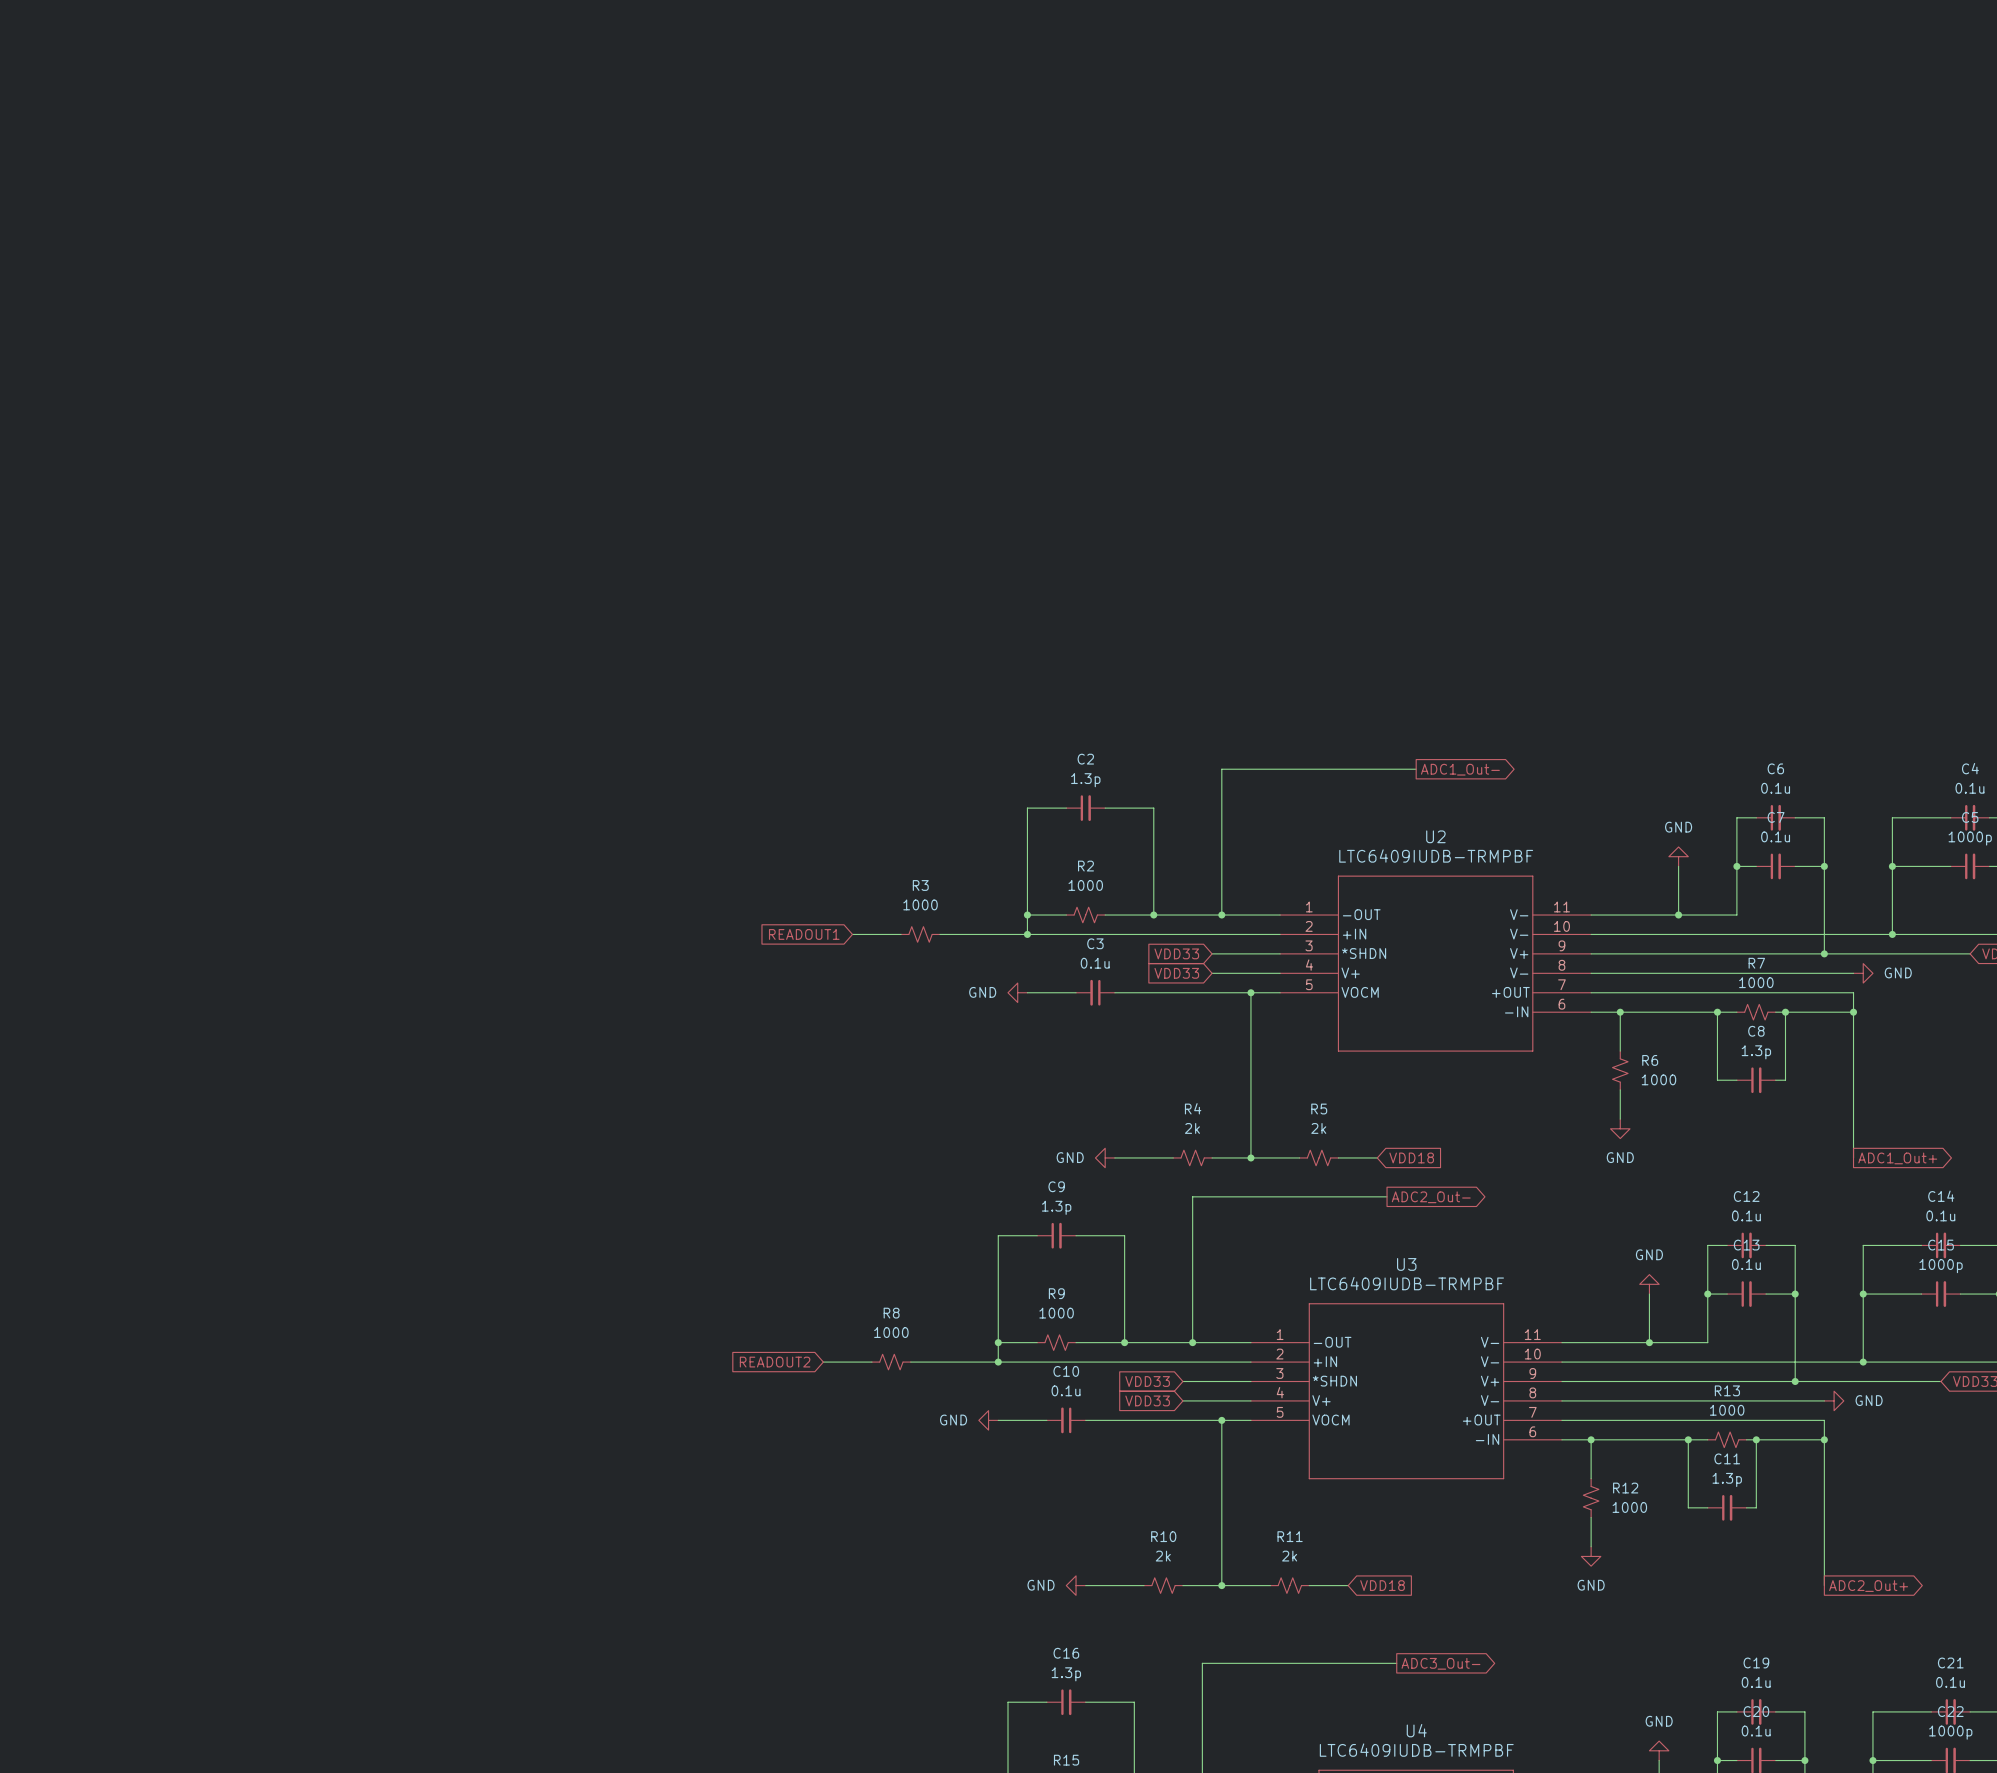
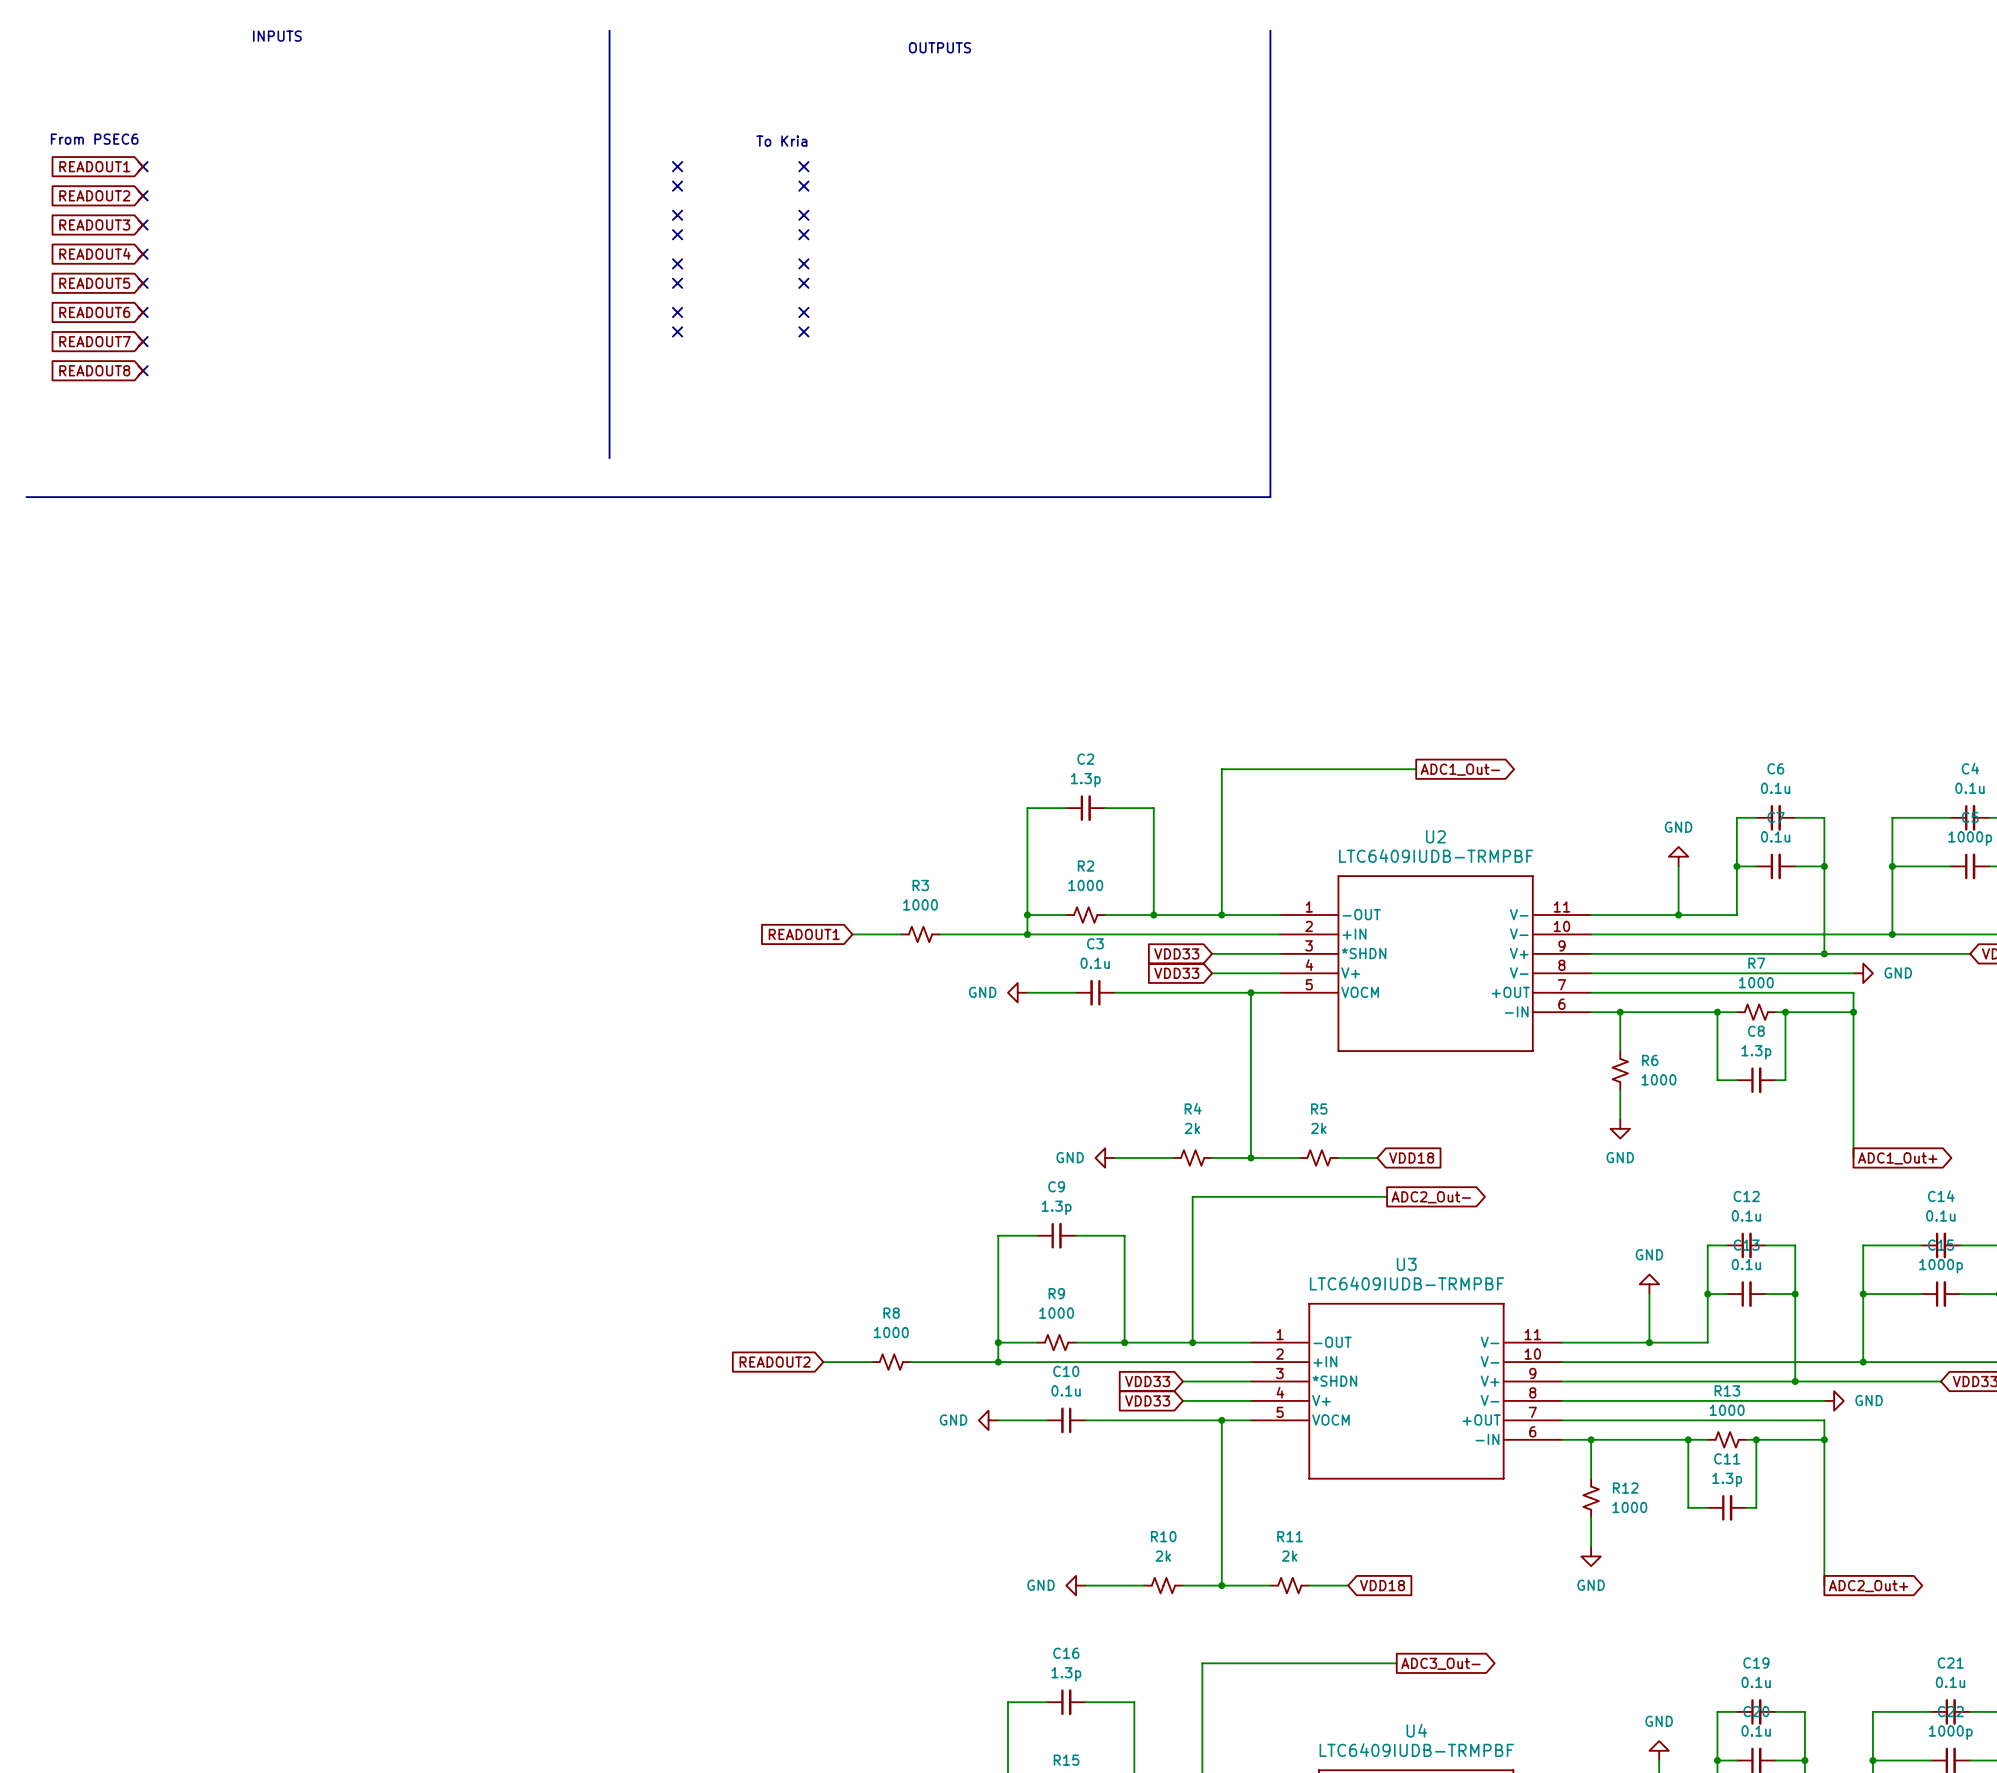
line: none -> (609, 30) (609, 458)
line: none -> (1270, 30) (1270, 497) (26, 497)
text: none -> INPUTS (277, 36)
text: none -> OUTPUTS (939, 47)
text: none -> From PSEC6 (94, 139)
text: none -> To Kria (781, 141)
global label: none -> READOUT1 (94, 166)
no-connect mark: none -> (143, 166)
no-connect mark: none -> (677, 166)
no-connect mark: none -> (803, 166)
no-connect mark: none -> (677, 186)
no-connect mark: none -> (803, 186)
global label: none -> READOUT2 (94, 195)
no-connect mark: none -> (143, 195)
no-connect mark: none -> (677, 215)
no-connect mark: none -> (803, 215)
global label: none -> READOUT3 (94, 224)
no-connect mark: none -> (143, 224)
no-connect mark: none -> (677, 234)
no-connect mark: none -> (803, 234)
global label: none -> READOUT4 (95, 253)
no-connect mark: none -> (143, 254)
no-connect mark: none -> (677, 263)
no-connect mark: none -> (803, 263)
global label: none -> READOUT5 (94, 283)
no-connect mark: none -> (143, 283)
no-connect mark: none -> (677, 283)
no-connect mark: none -> (803, 283)
global label: none -> READOUT6 (94, 312)
no-connect mark: none -> (143, 312)
no-connect mark: none -> (677, 312)
no-connect mark: none -> (803, 312)
no-connect mark: none -> (677, 331)
no-connect mark: none -> (803, 331)
global label: none -> READOUT7 (95, 341)
no-connect mark: none -> (143, 341)
global label: none -> READOUT8 (94, 370)
no-connect mark: none -> (143, 370)

